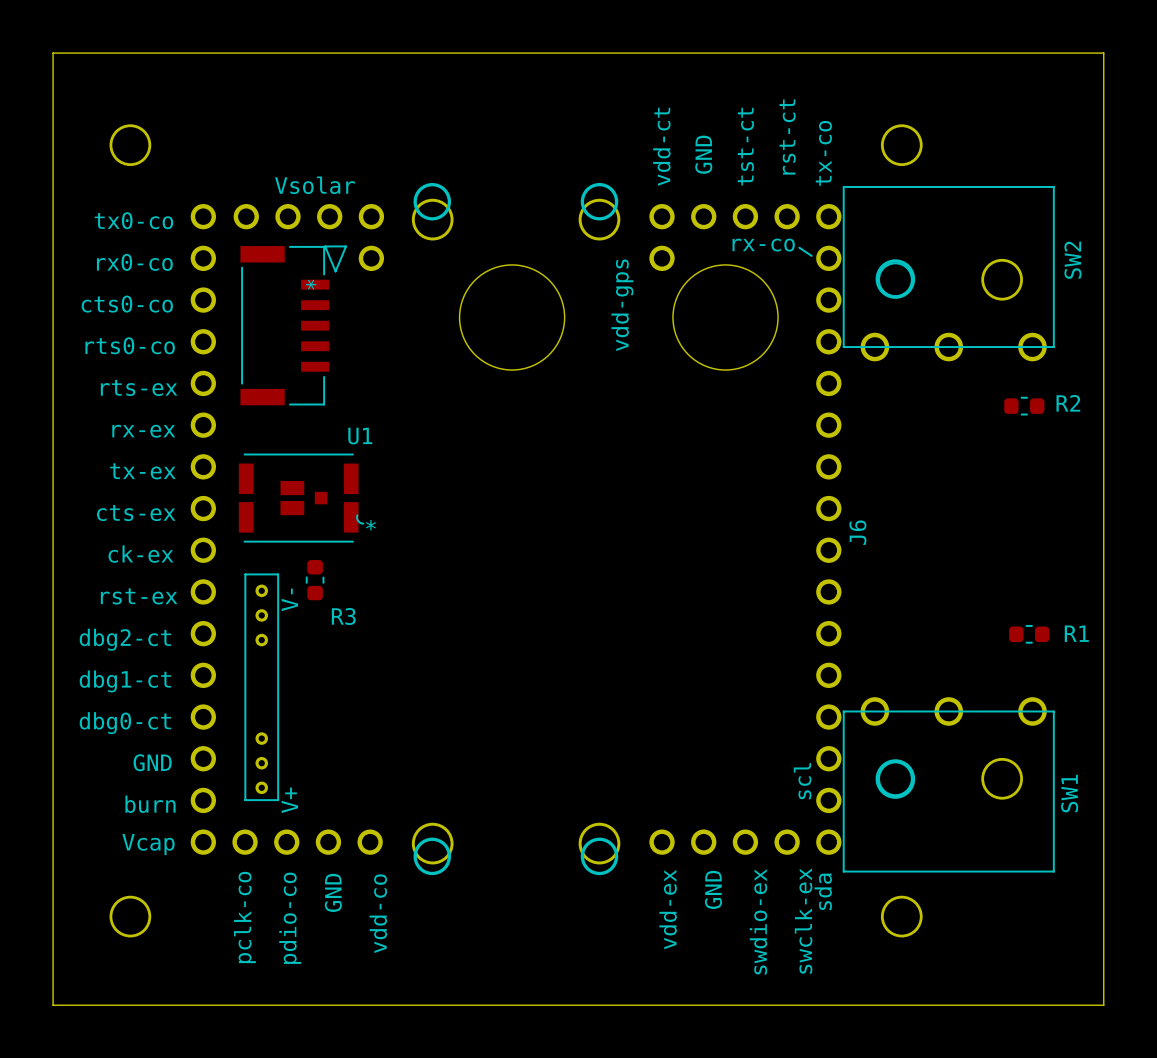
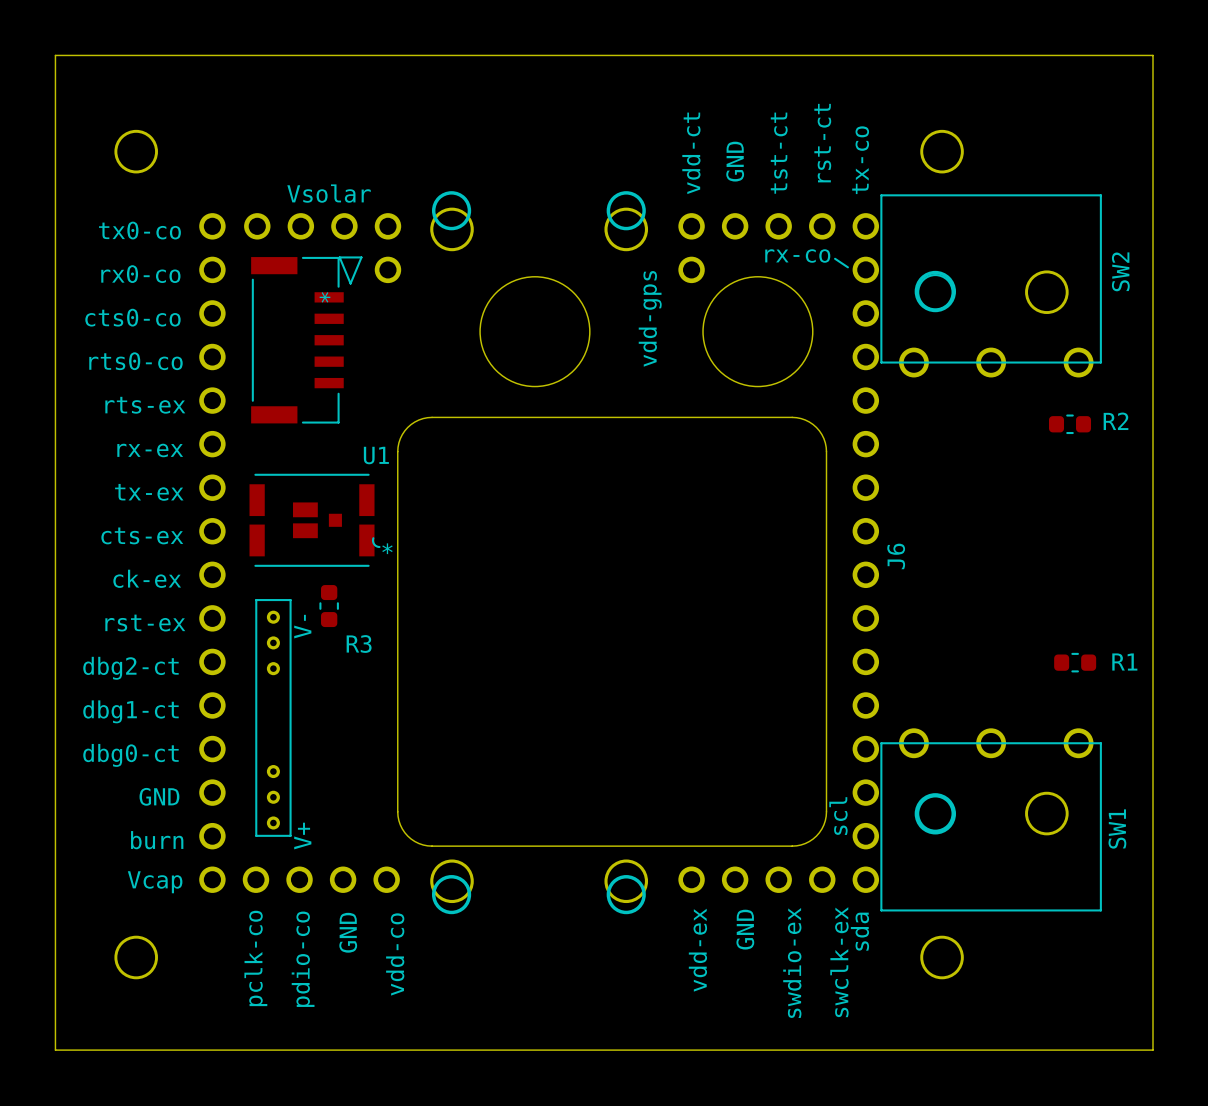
board edge: none -> (432, 417) (792, 417) (805, 420) (816, 427) (823, 438) (826, 451) (826, 811) (823, 824) (816, 836) (805, 843) (792, 846) (432, 846) (418, 843) (407, 836) (400, 824) (397, 811) (397, 451) (400, 438) (407, 427) (418, 420) (432, 417)

